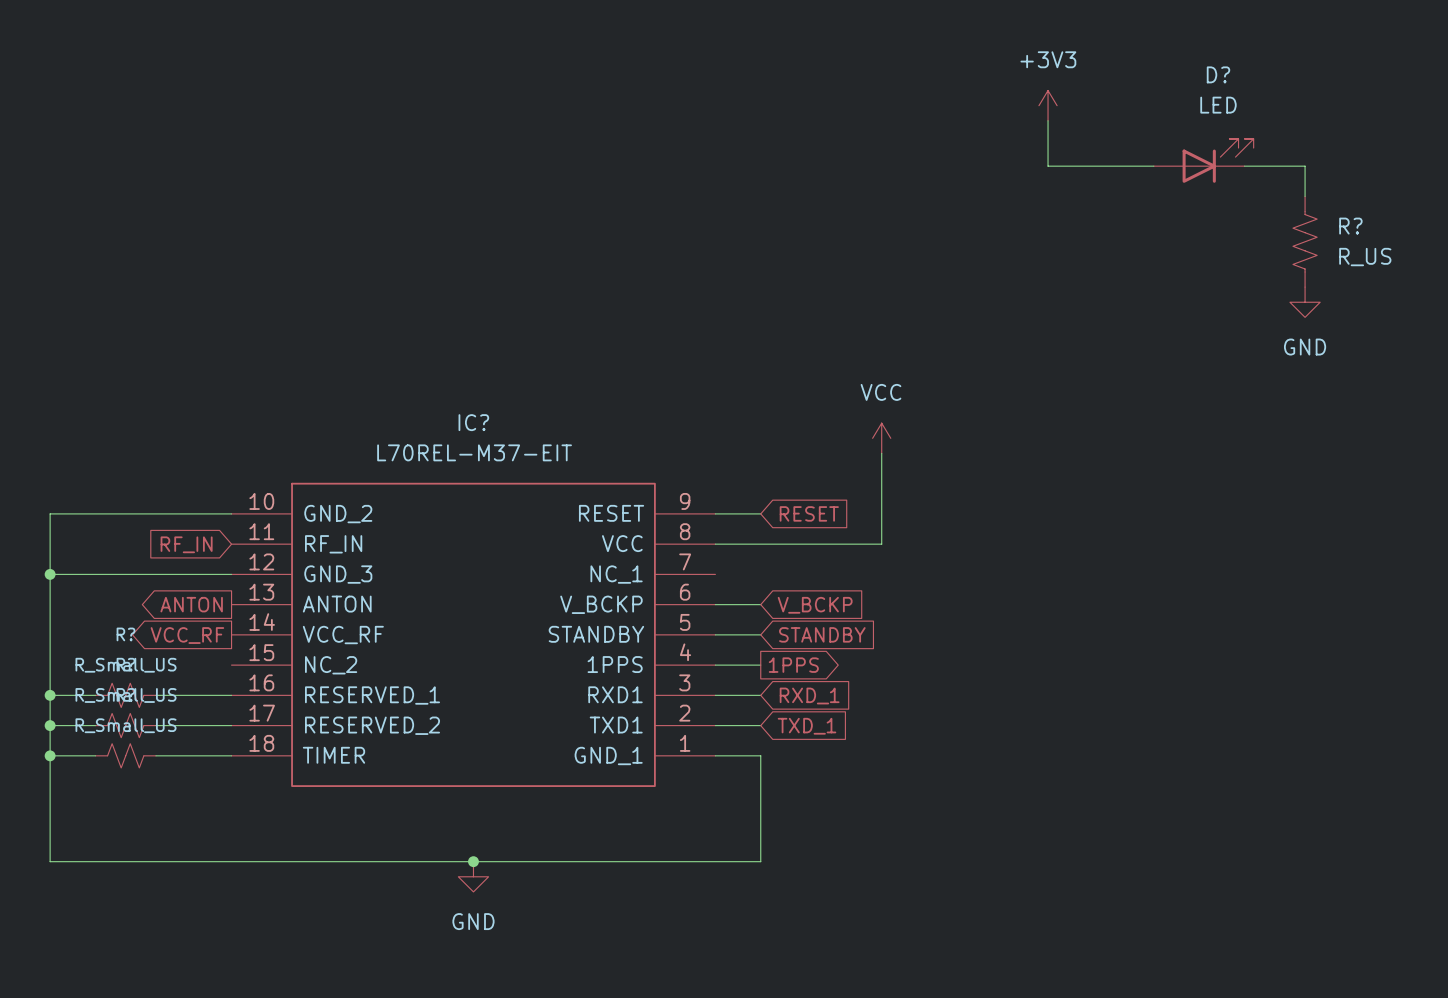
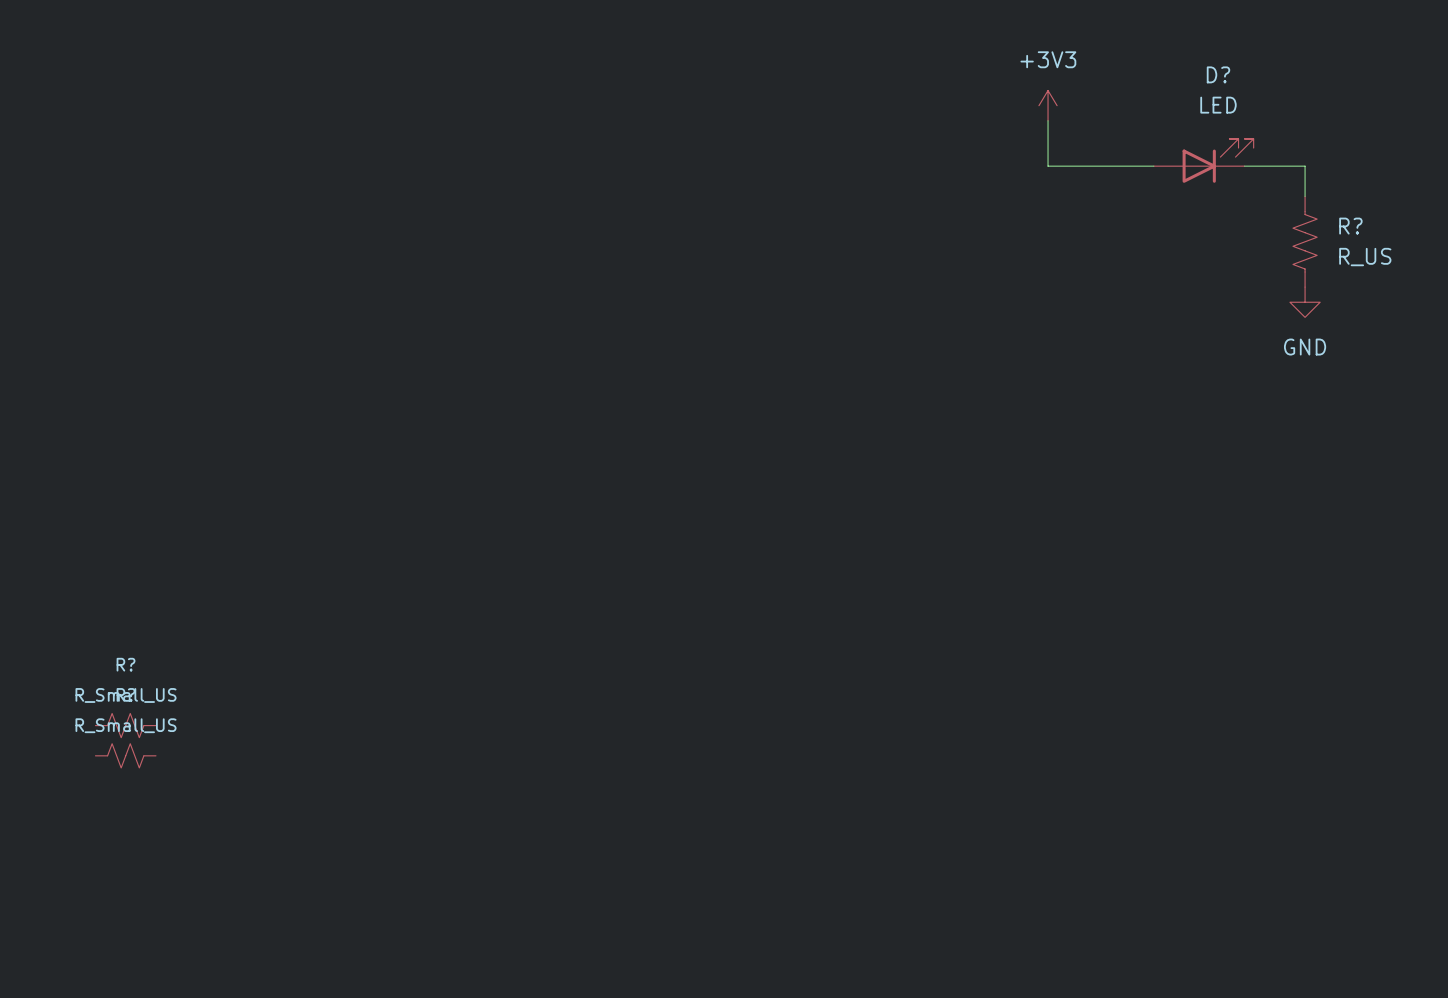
power symbol: VCC (881, 438) -> none
wire: (881, 453) (881, 544) (715, 544) -> none
wire: (231, 513) (50, 513) (50, 861) (760, 861) (760, 755) (715, 755) -> none
wire: (715, 513) (760, 513) -> none
global label: RESET (809, 513) -> none
global label: RF_IN (186, 544) -> none
wire: (50, 574) (231, 574) -> none
junction: (50, 574) -> none
global label: ANTON (191, 604) -> none
wire: (715, 604) (760, 604) -> none
global label: V_BCKP (815, 605) -> none
IC?: L70REL-M37-EIT (473, 634) -> none
wire: (715, 634) (760, 634) -> none
global label: STANDBY (822, 634) -> none
global label: VCC_RF (187, 635) -> none
wire: (715, 665) (760, 665) -> none
global label: 1PPS (793, 665) -> none
wire: (50, 695) (95, 695) -> none
junction: (50, 695) -> none
R?: R_Small_US (125, 695) -> none
wire: (155, 695) (231, 695) -> none
wire: (715, 695) (760, 695) -> none
global label: RXD_1 (809, 696) -> none
wire: (50, 725) (95, 725) -> none
junction: (50, 725) -> none
wire: (155, 725) (231, 725) -> none
wire: (715, 725) (760, 725) -> none
global label: TXD_1 (807, 726) -> none
wire: (50, 755) (95, 755) -> none
junction: (50, 755) -> none
wire: (155, 755) (231, 755) -> none
junction: (473, 861) -> none
power symbol: GND (473, 876) -> none

